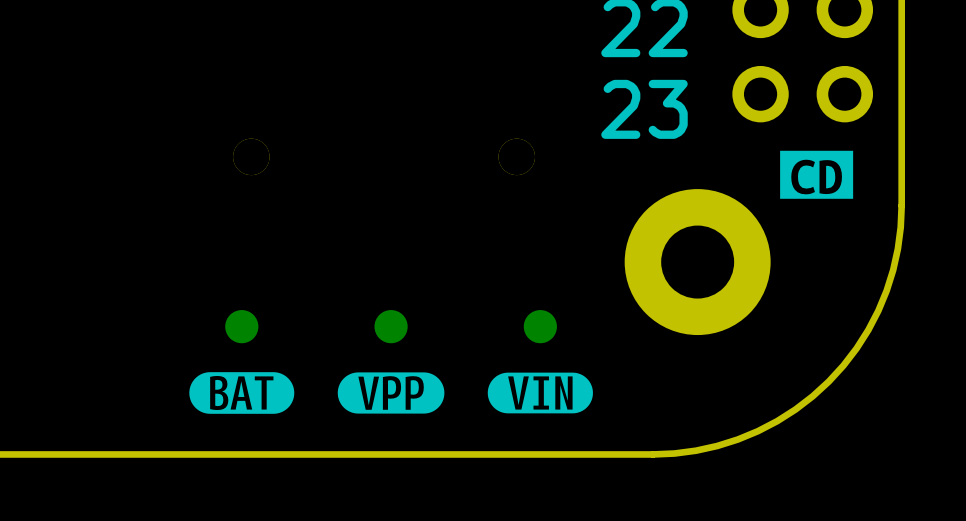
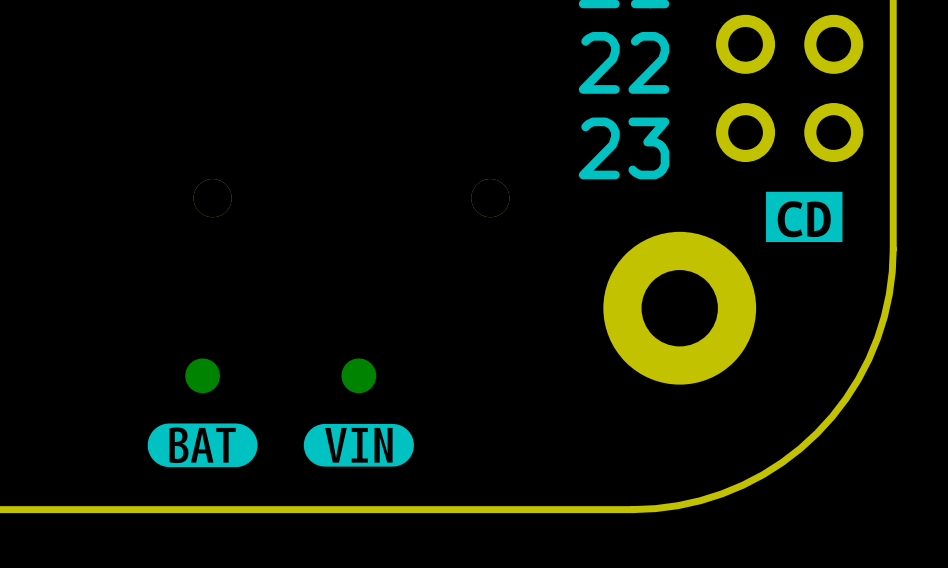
part: (540, 326) -> none
drawing: [337, 372, 445, 414] -> none
drawing position: (540, 392) -> (358, 445)

